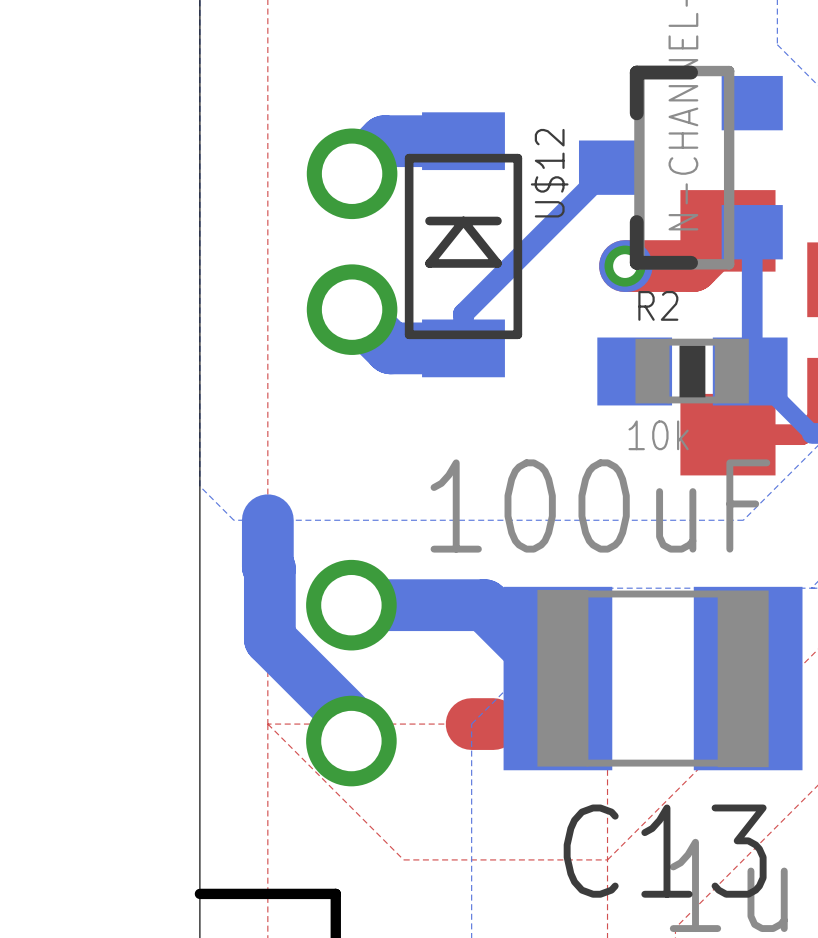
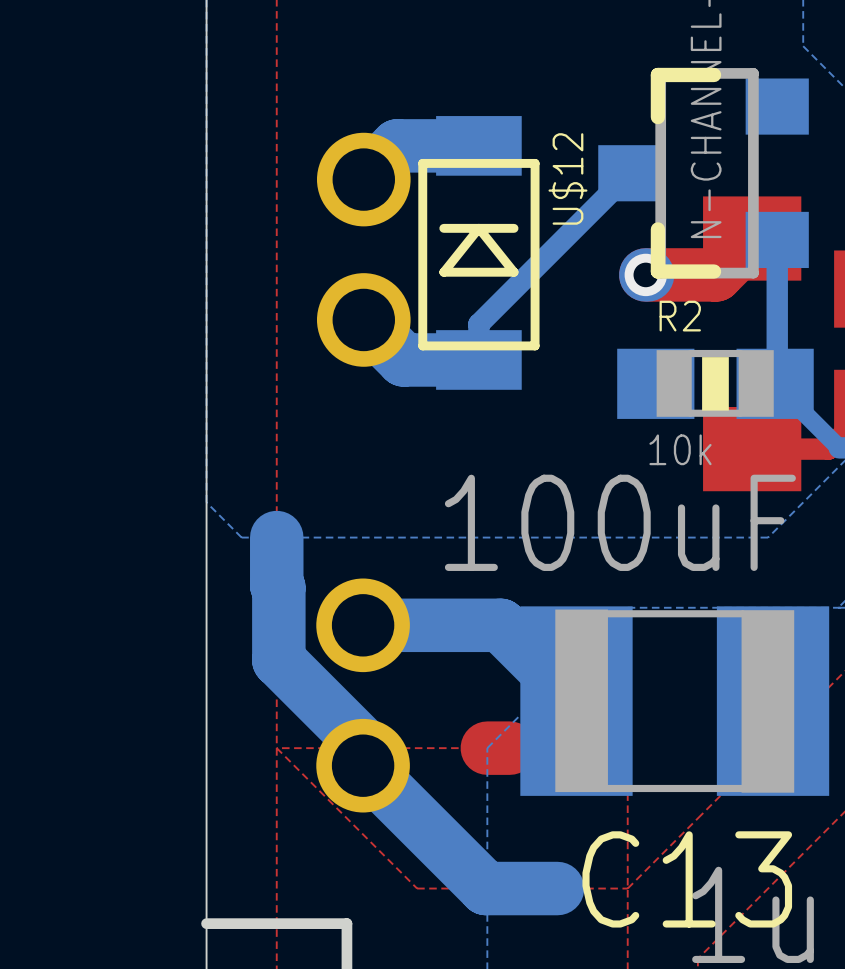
bottom track: none -> (363, 765) (485, 888) (557, 888)

